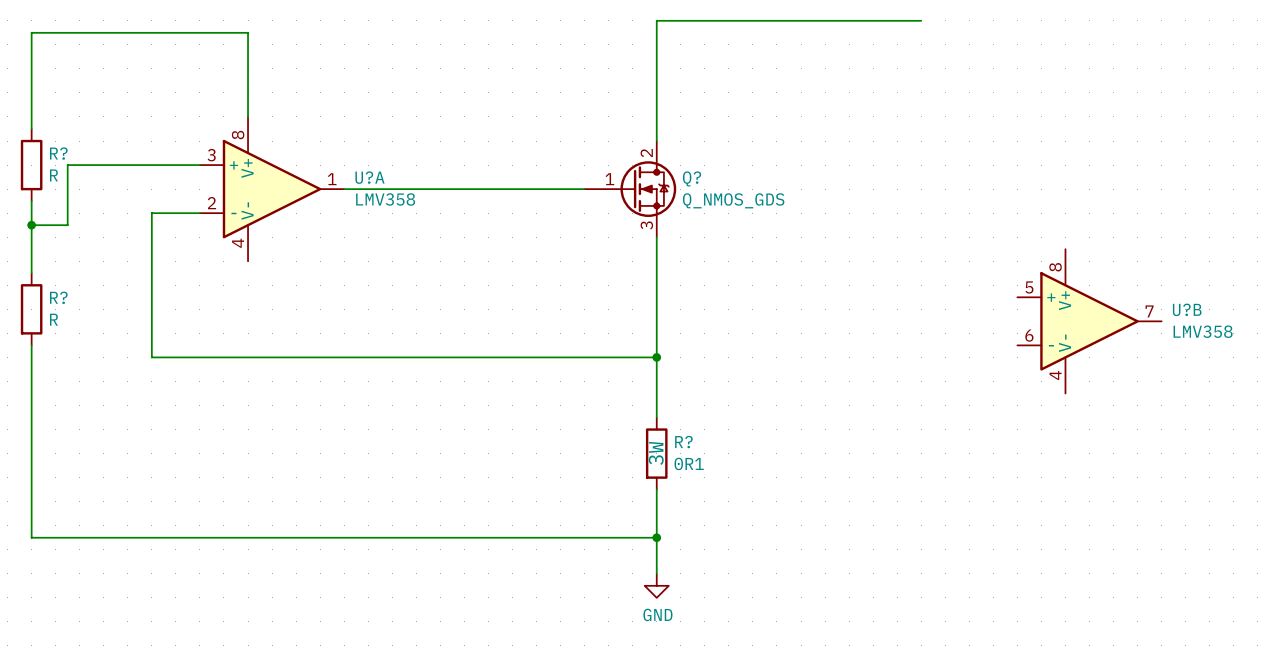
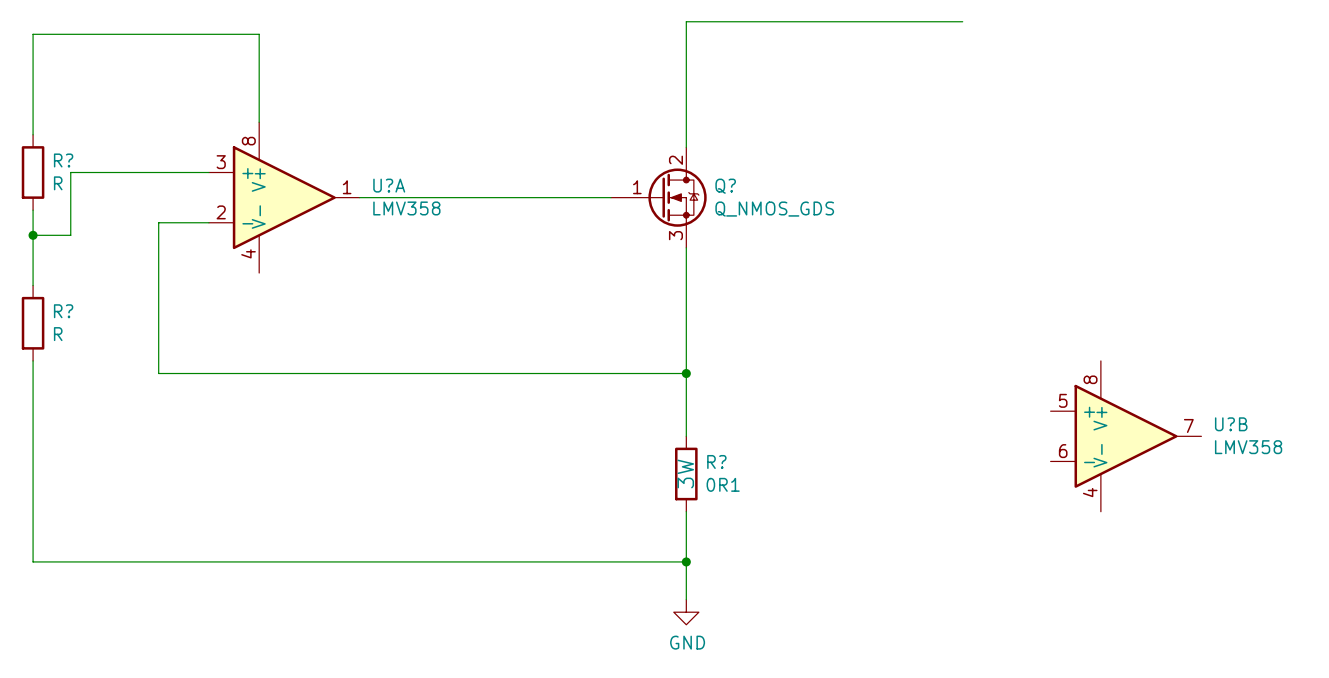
U?B position: (1089, 321) -> (1126, 436)

